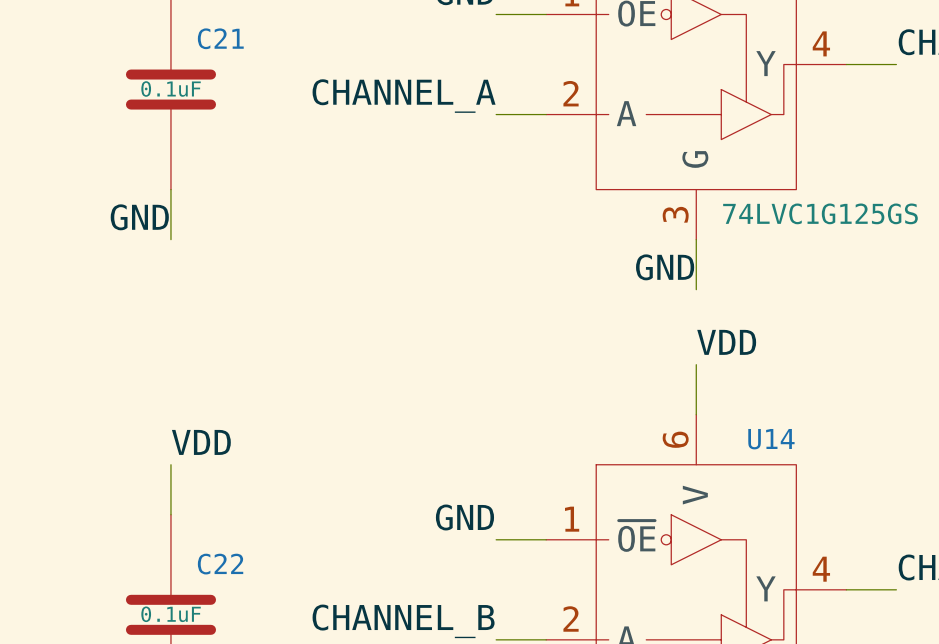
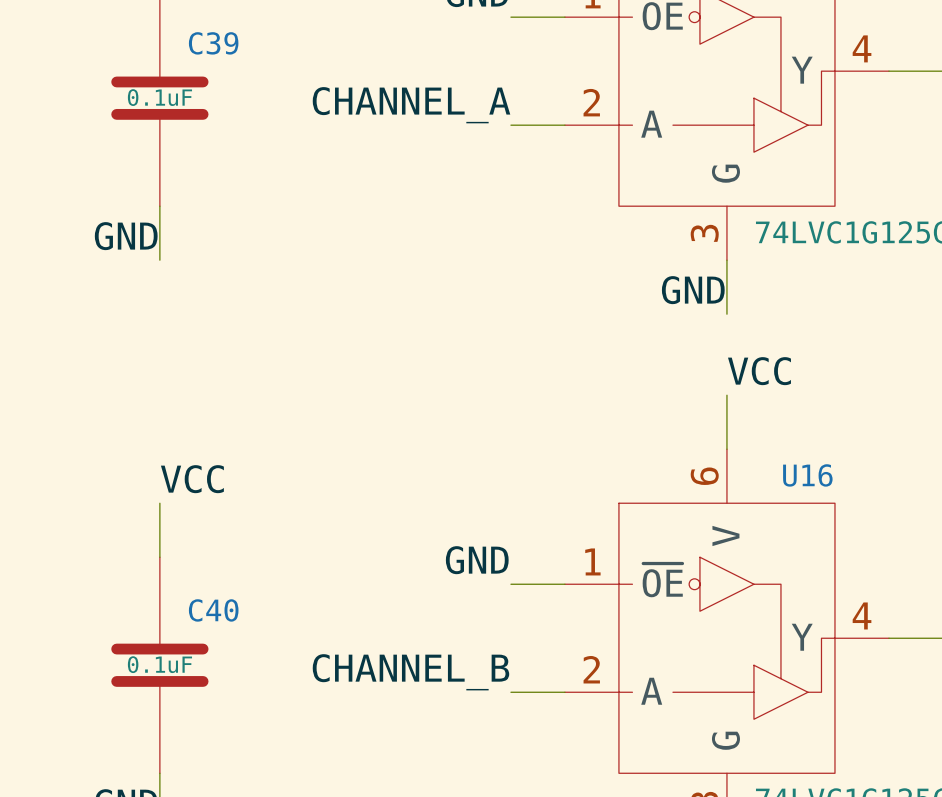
C21 name: C21 (220, 38) -> C39 (213, 43)
label: VDD (726, 342) -> VCC (759, 371)
U14 name: U14 (771, 439) -> U16 (807, 475)
label: VDD (201, 442) -> VCC (192, 479)
C22 name: C22 (220, 564) -> C40 (213, 610)

